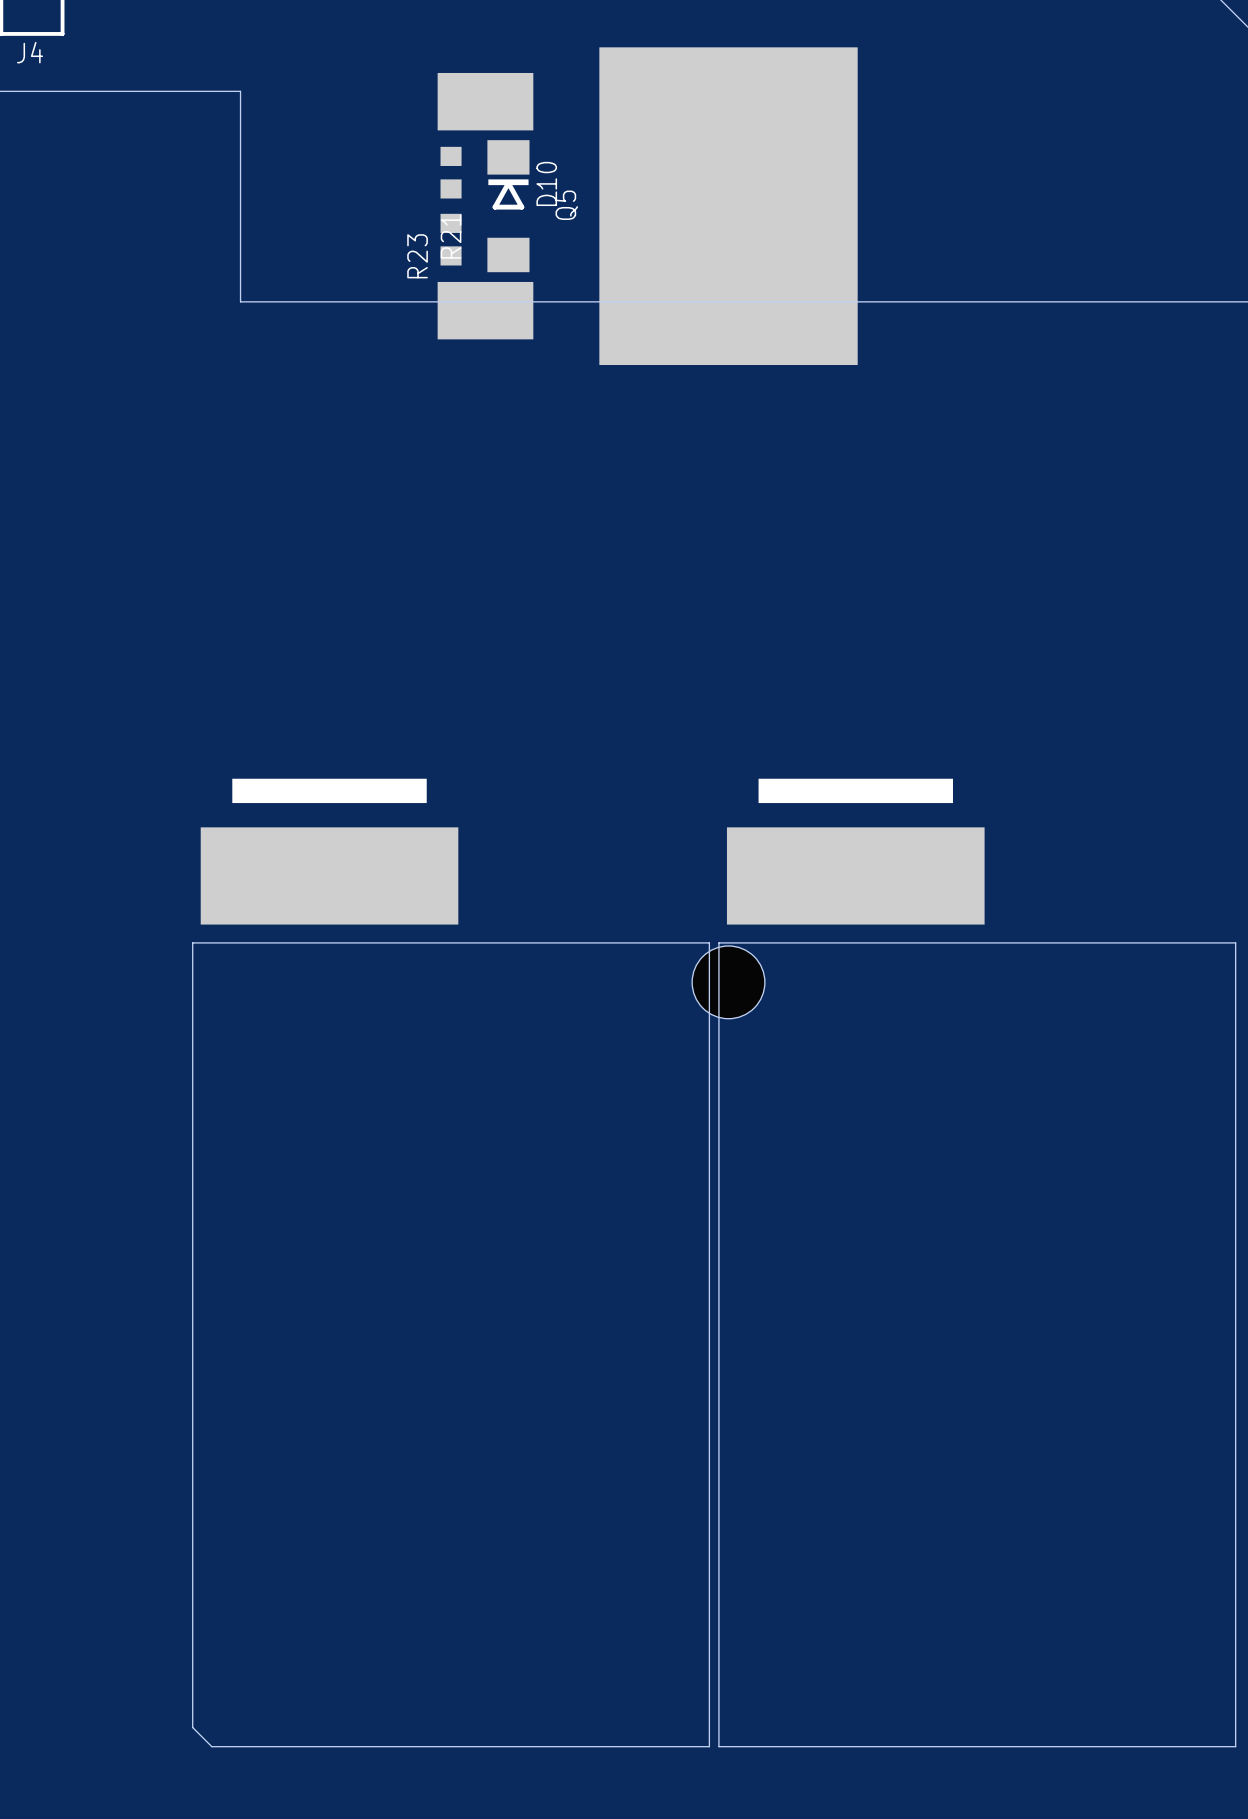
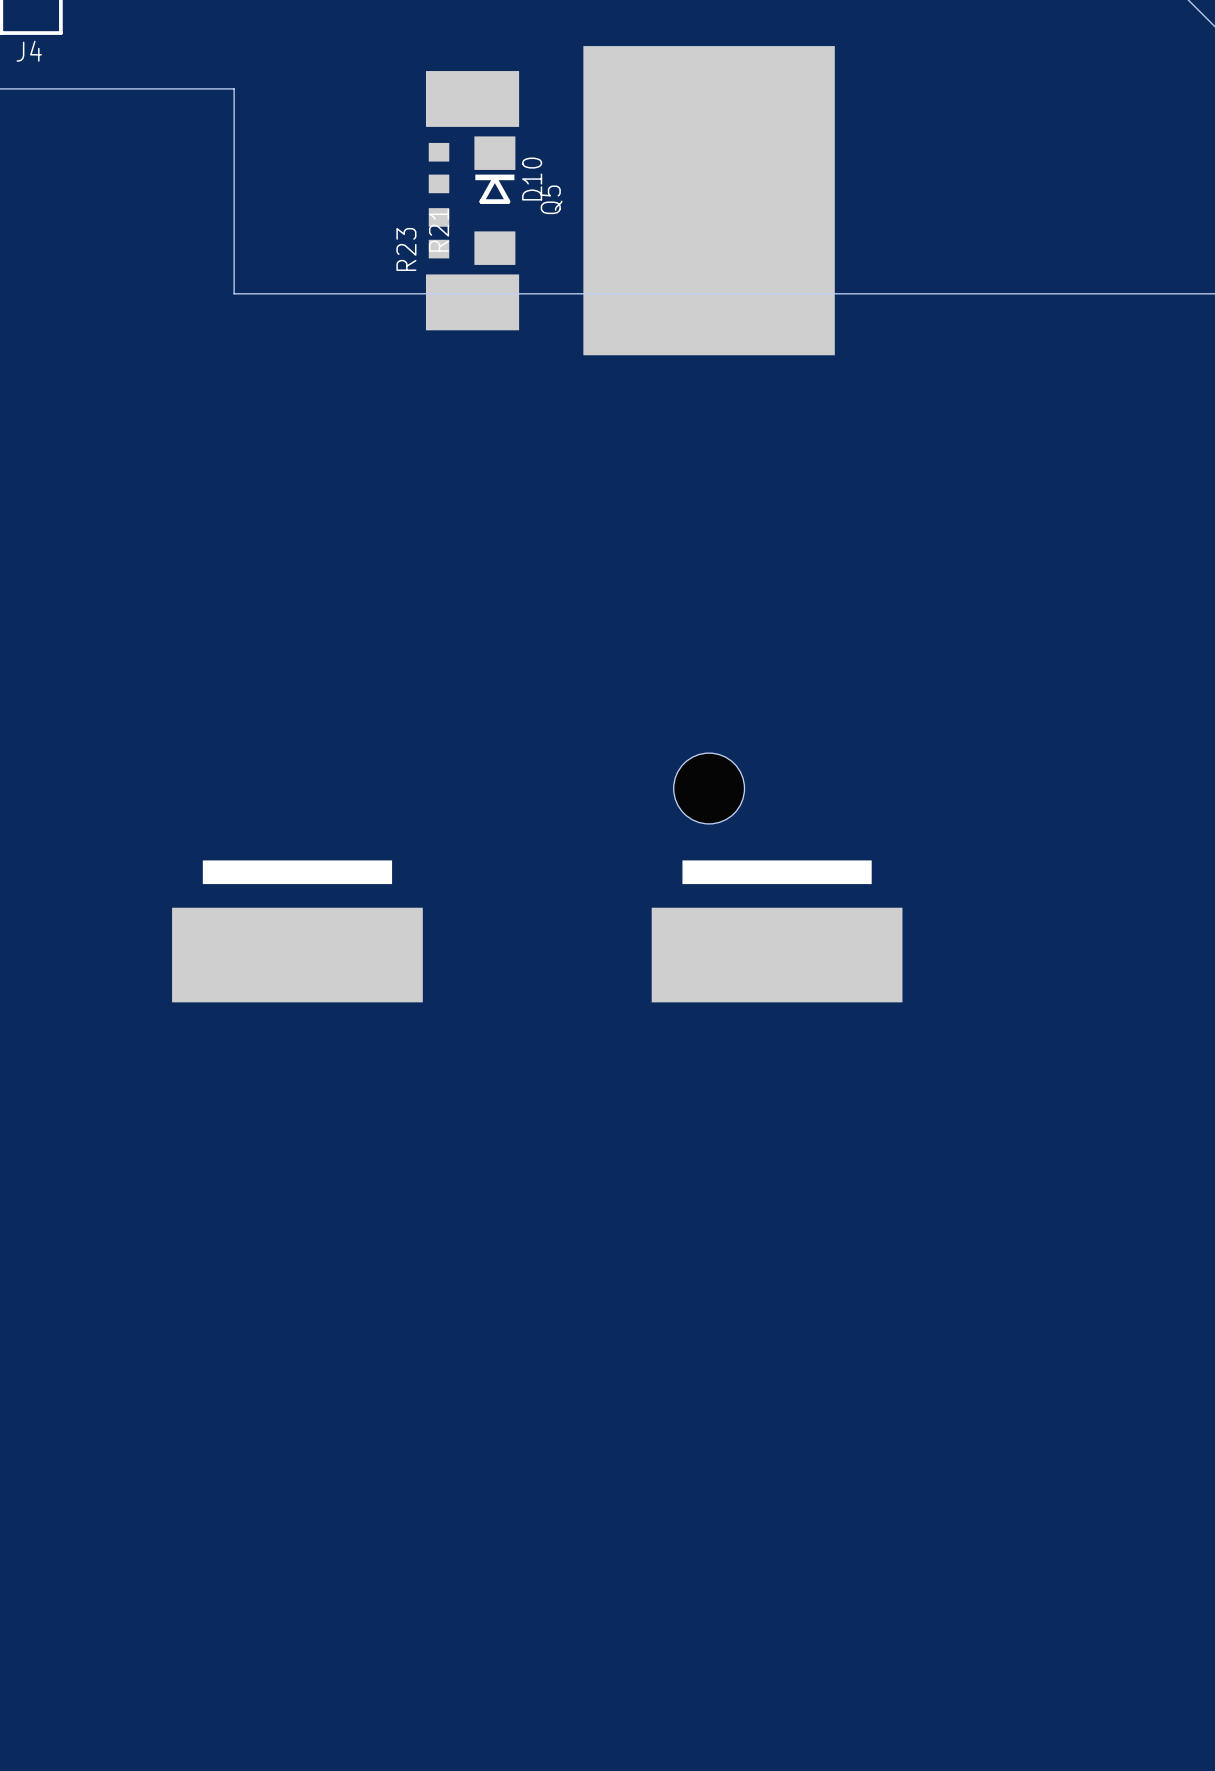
part position: (329, 851) -> (297, 931)
part position: (855, 851) -> (777, 931)
board edge: (709, 942) (709, 1746) (211, 1746) (192, 1727) (192, 942) (709, 942) -> none
board edge: (1235, 942) (718, 942) (718, 1746) (1235, 1746) (1235, 942) -> none
hole position: (728, 982) -> (709, 788)

